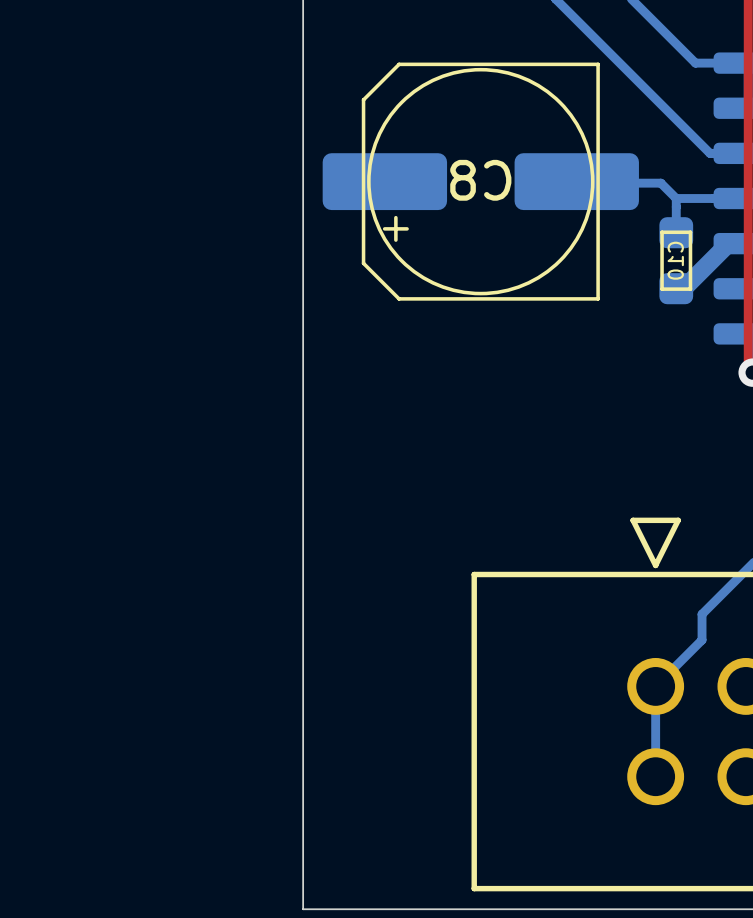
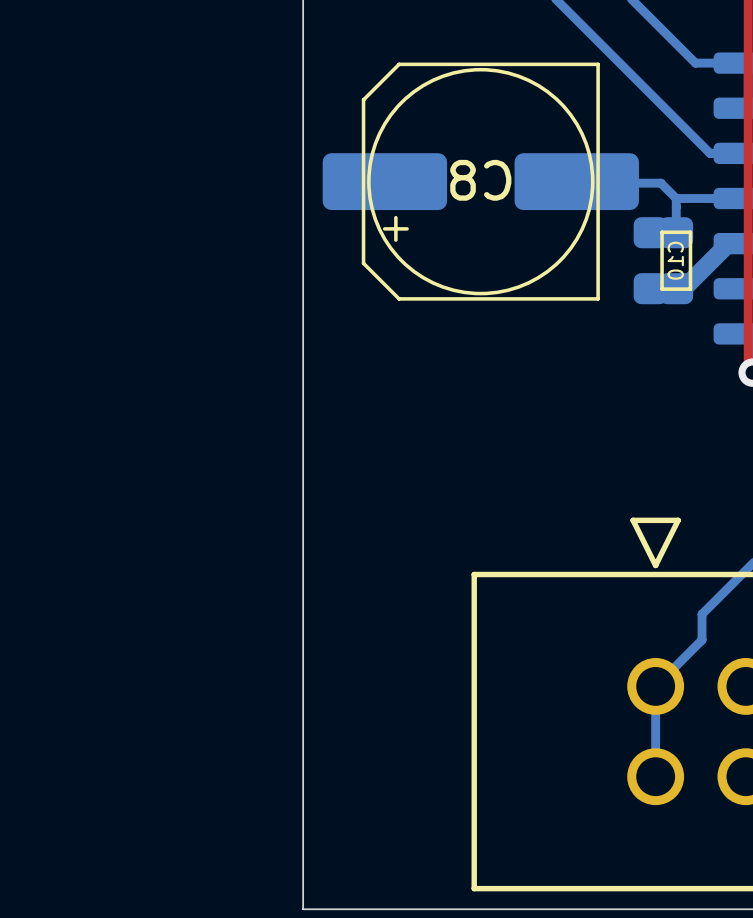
part: none -> (650, 260)

